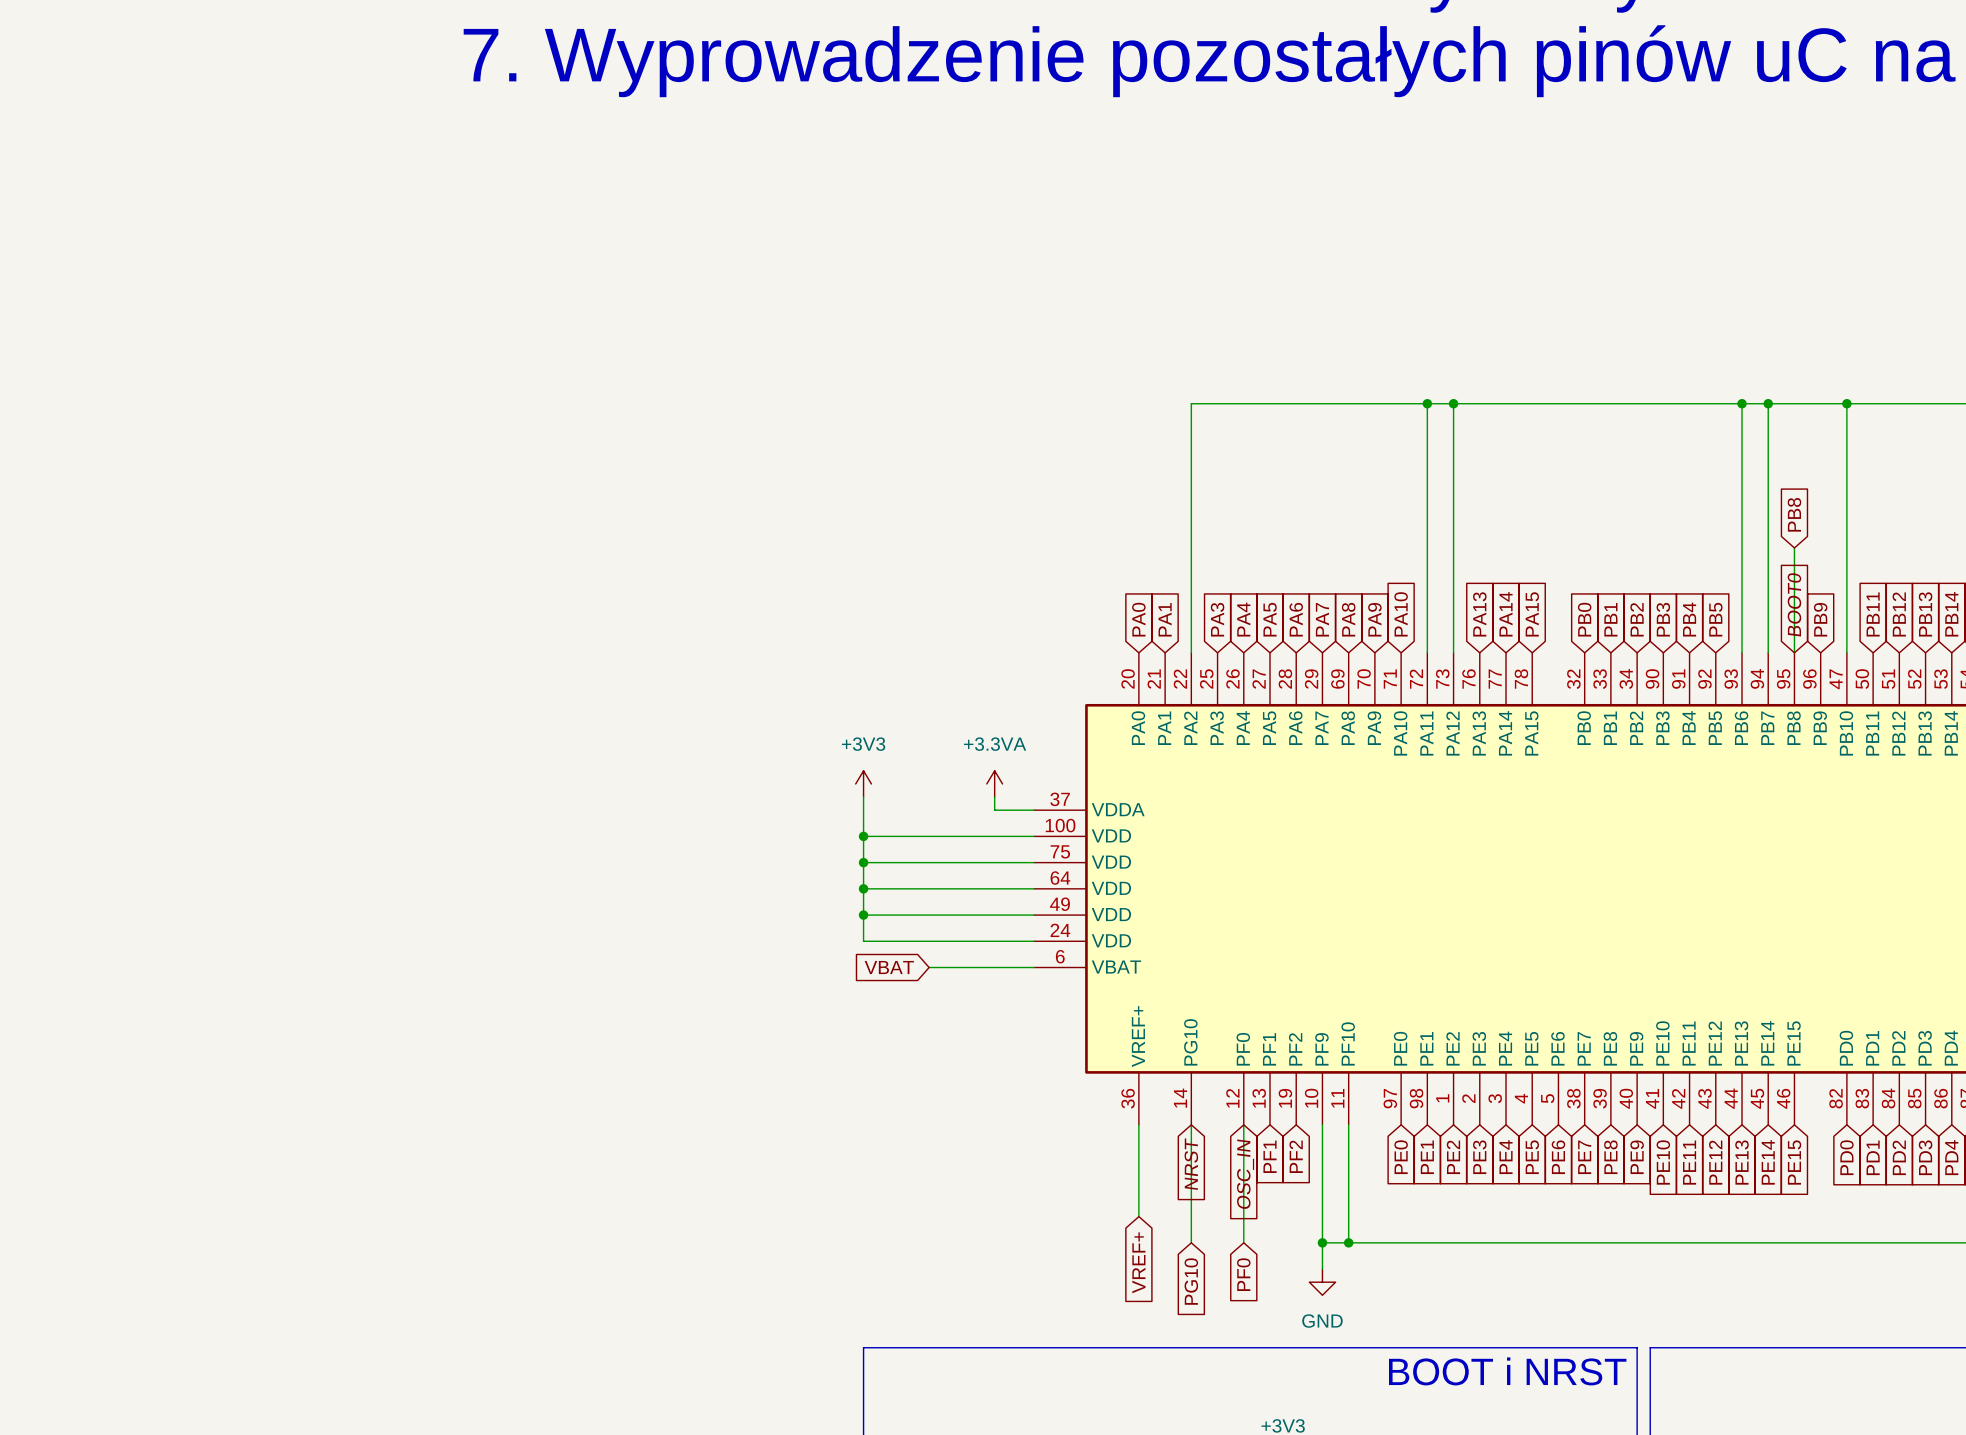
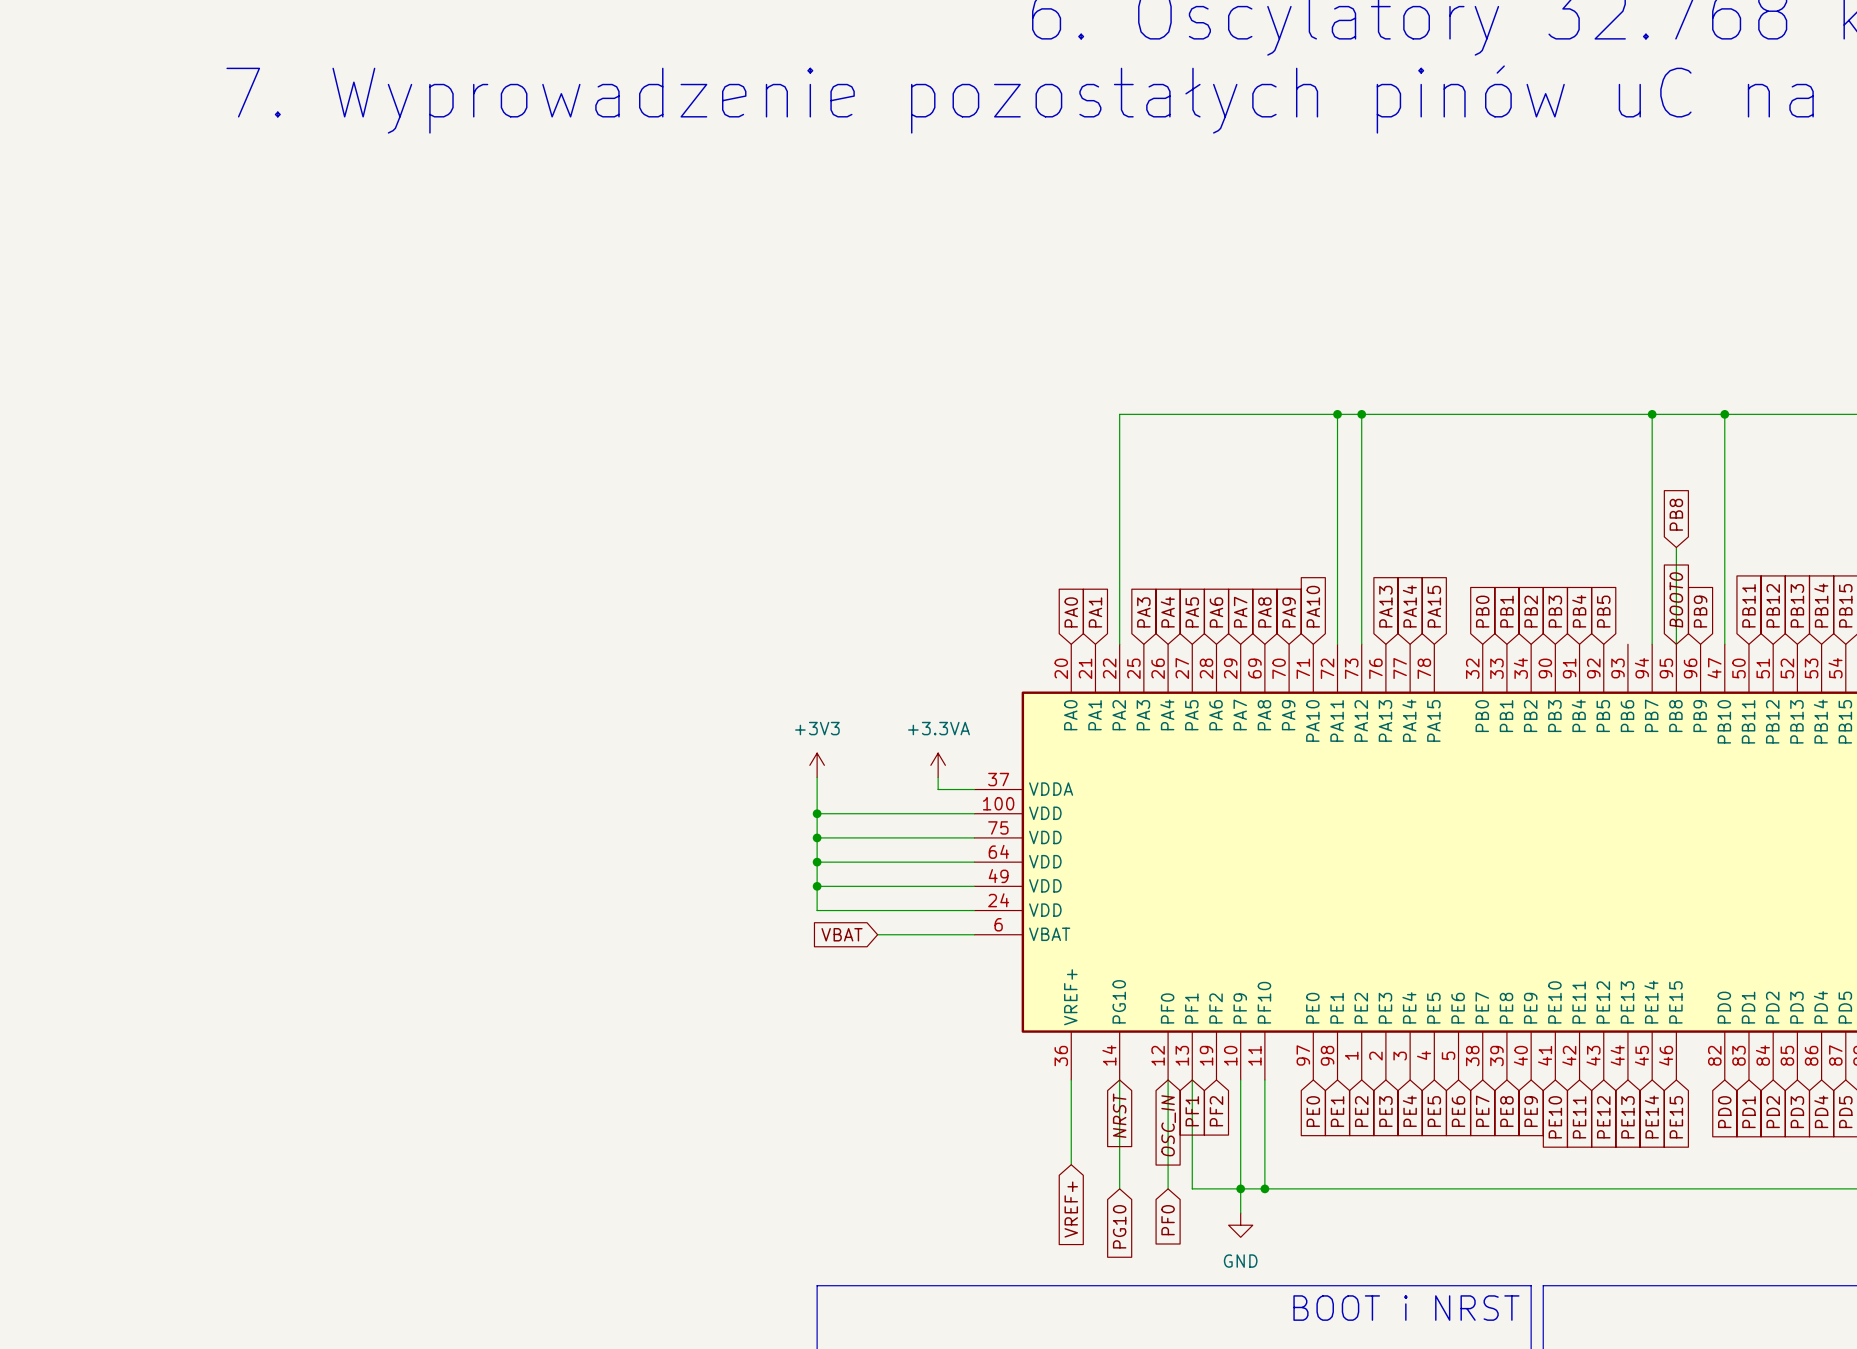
wire: (1742, 403) (1742, 652) -> none
junction: (1742, 403) -> none
wire: none -> (1192, 1079) (1192, 1188) (1240, 1188)

